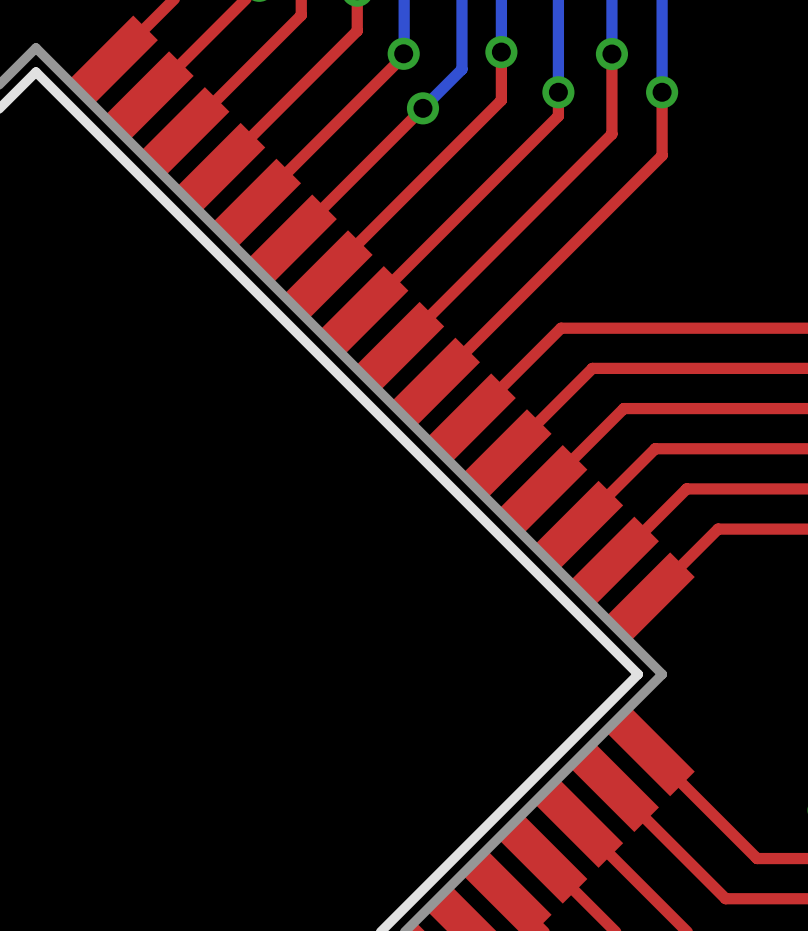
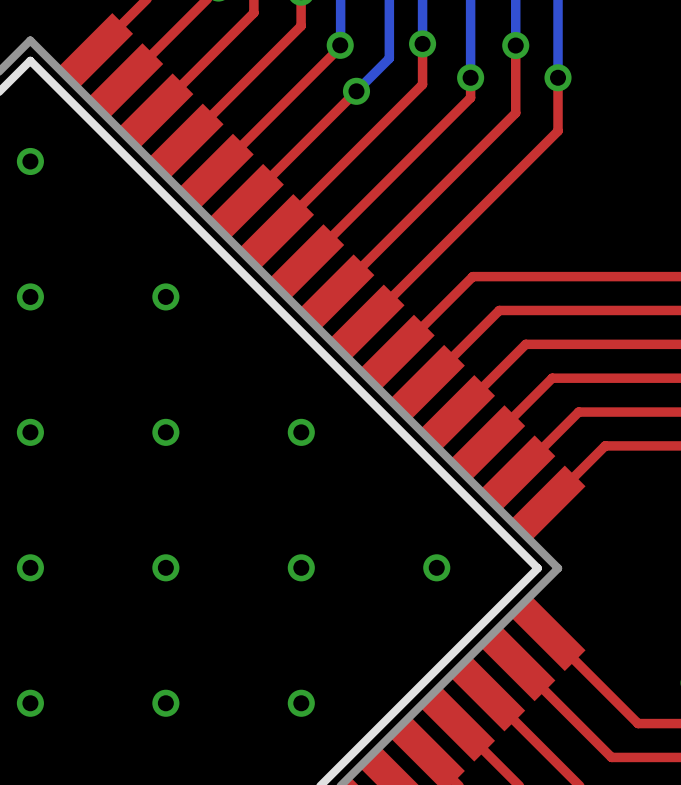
via: none -> (30, 161)
via: none -> (30, 296)
via: none -> (165, 296)
via: none -> (30, 432)
via: none -> (165, 432)
via: none -> (301, 432)
via: none -> (30, 567)
via: none -> (165, 567)
via: none -> (301, 567)
via: none -> (436, 567)
via: none -> (30, 703)
via: none -> (165, 703)
via: none -> (301, 703)

